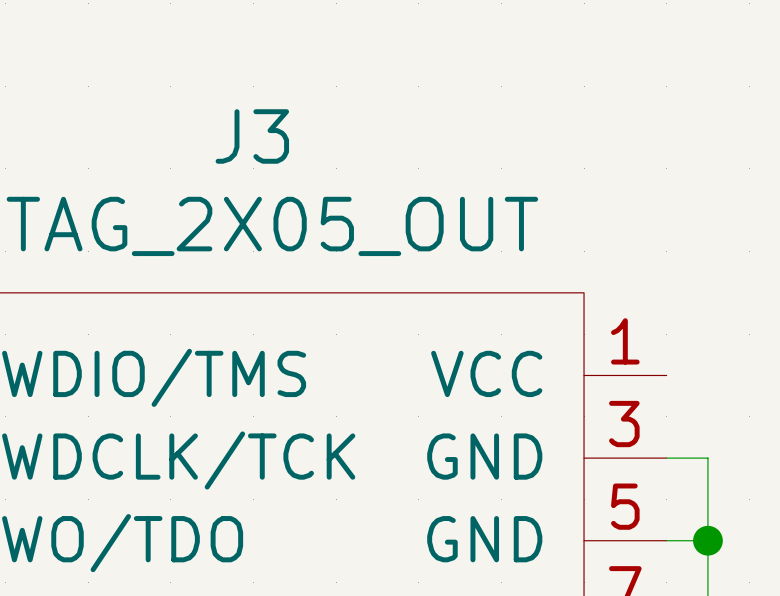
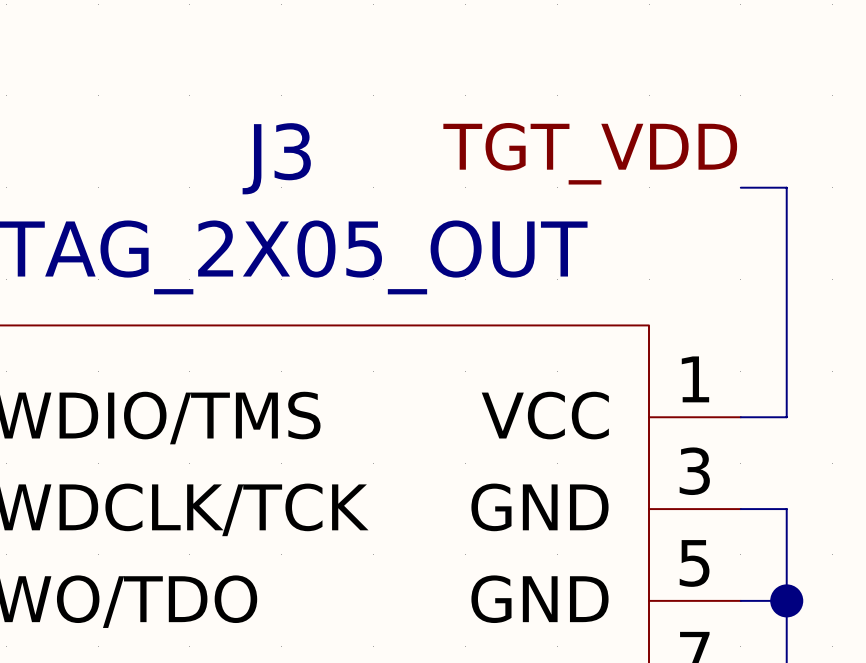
label: none -> TGT_VDD (590, 153)
wire: none -> (740, 187) (786, 187) (786, 417) (740, 417)

